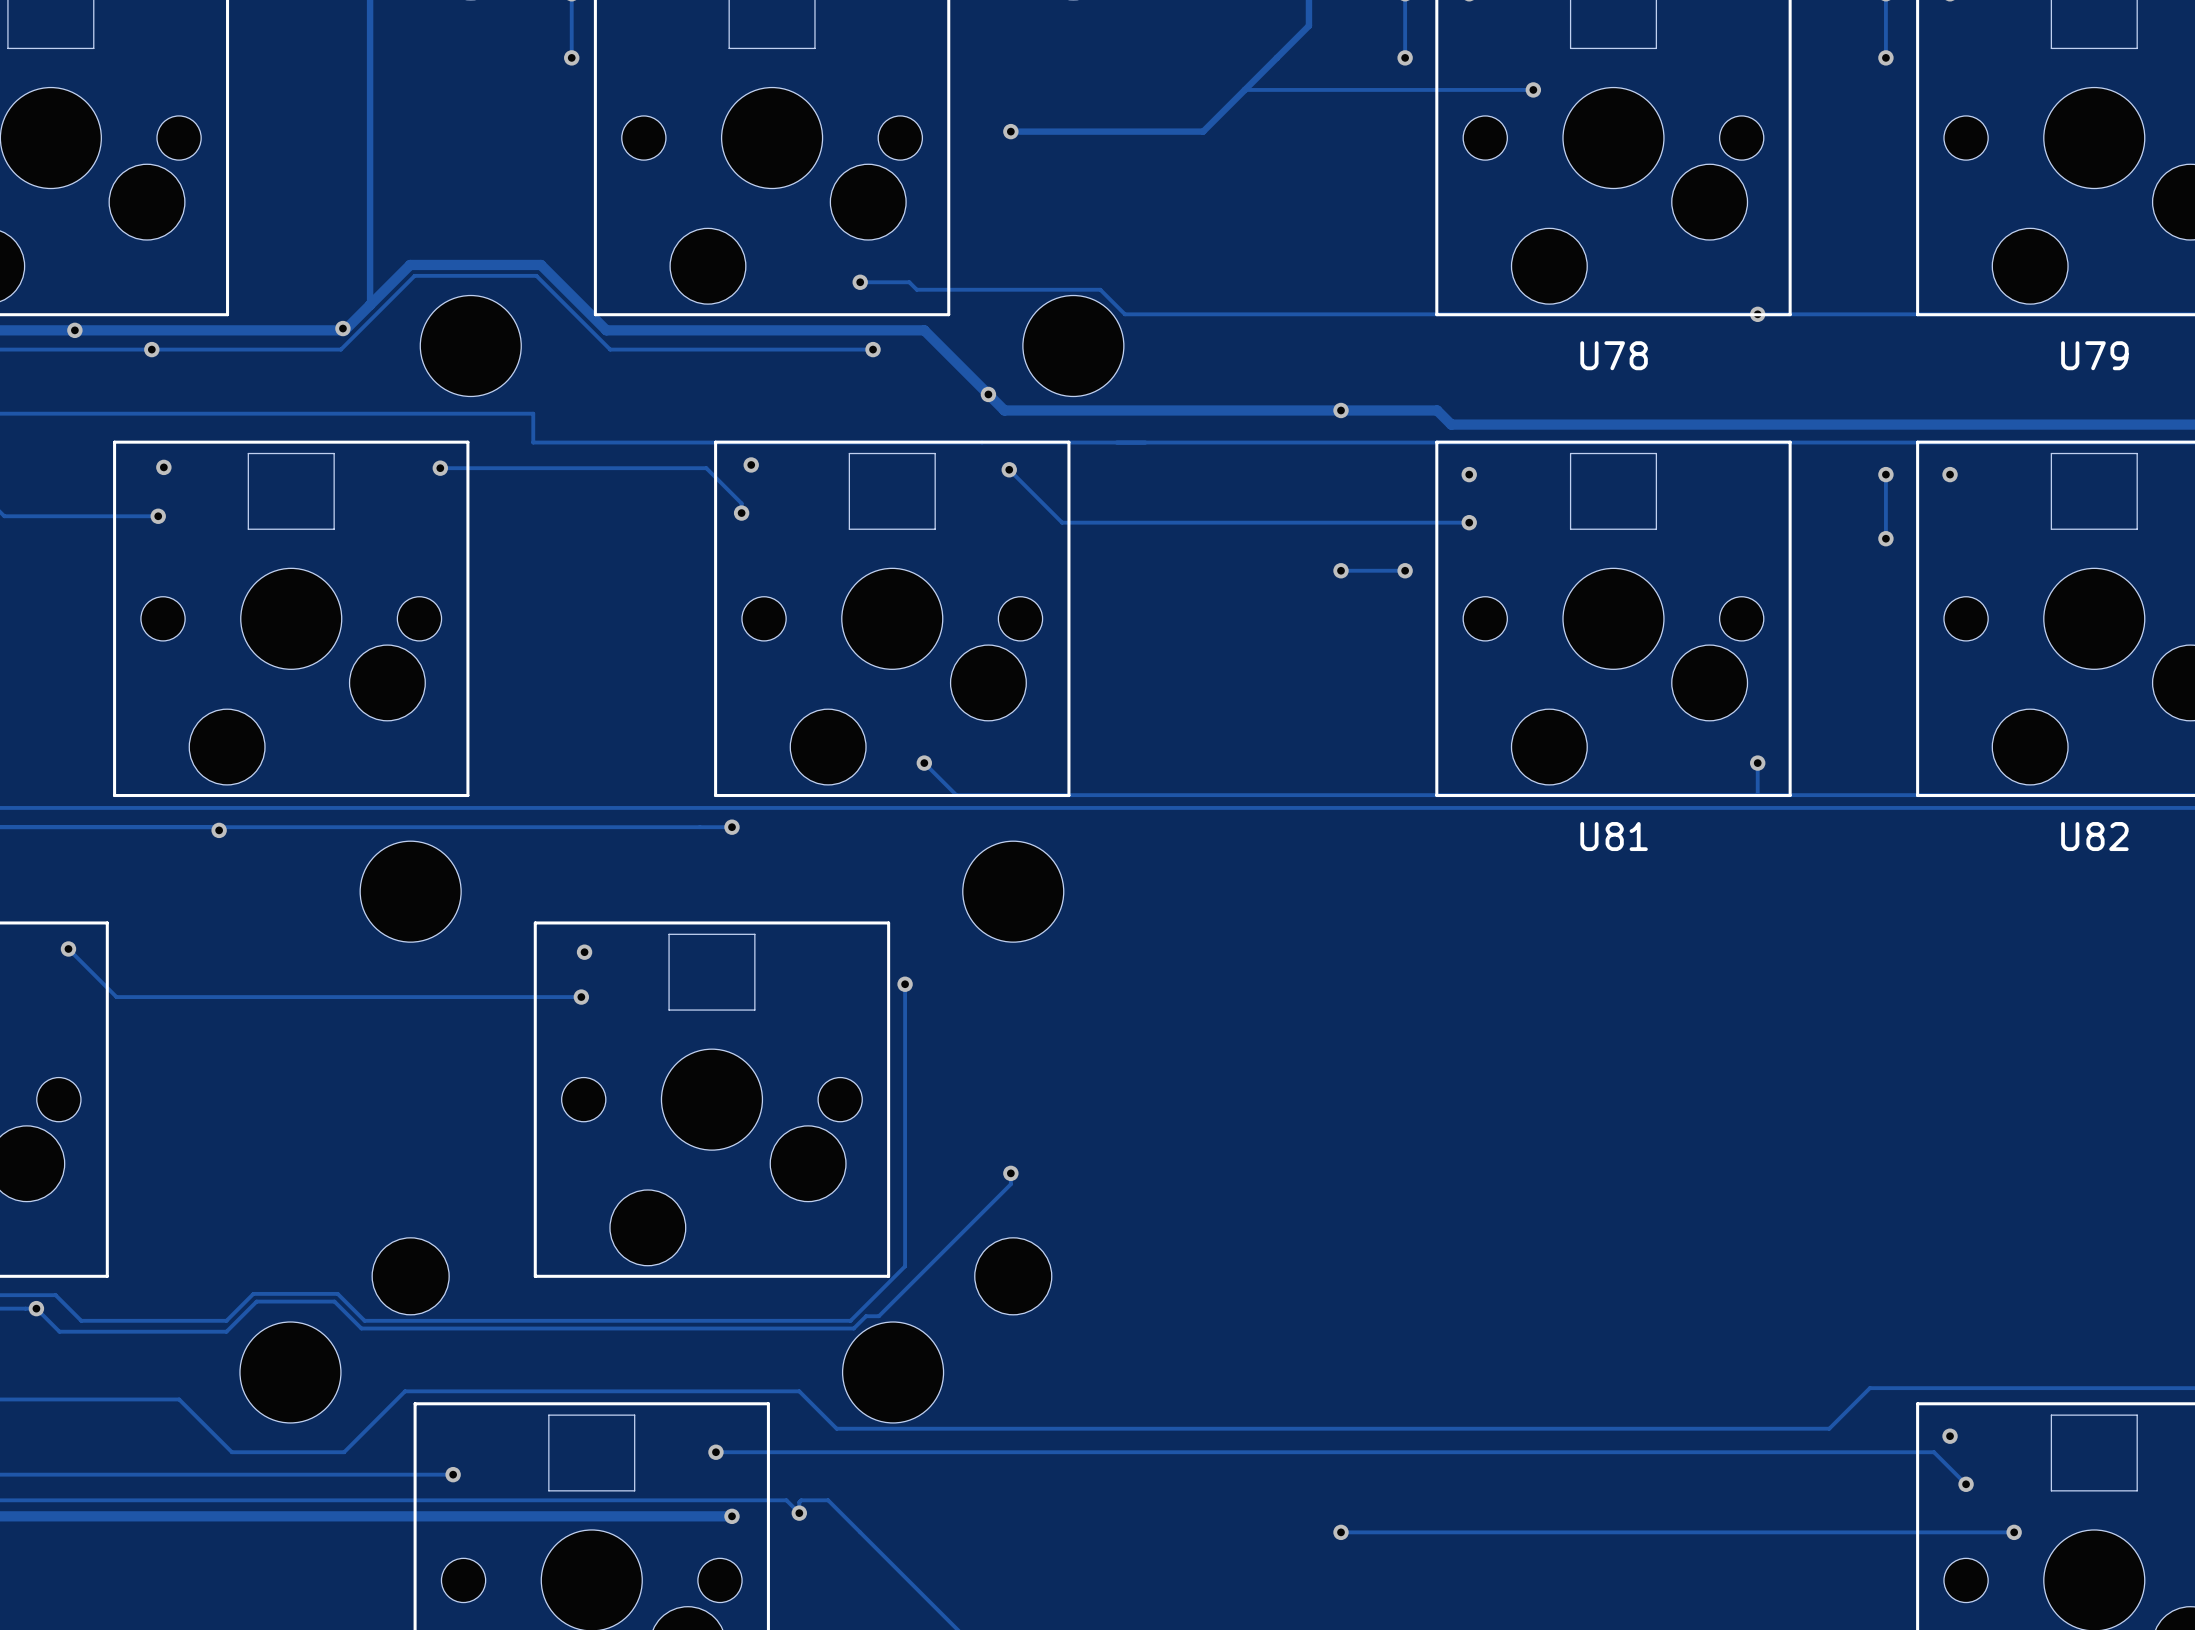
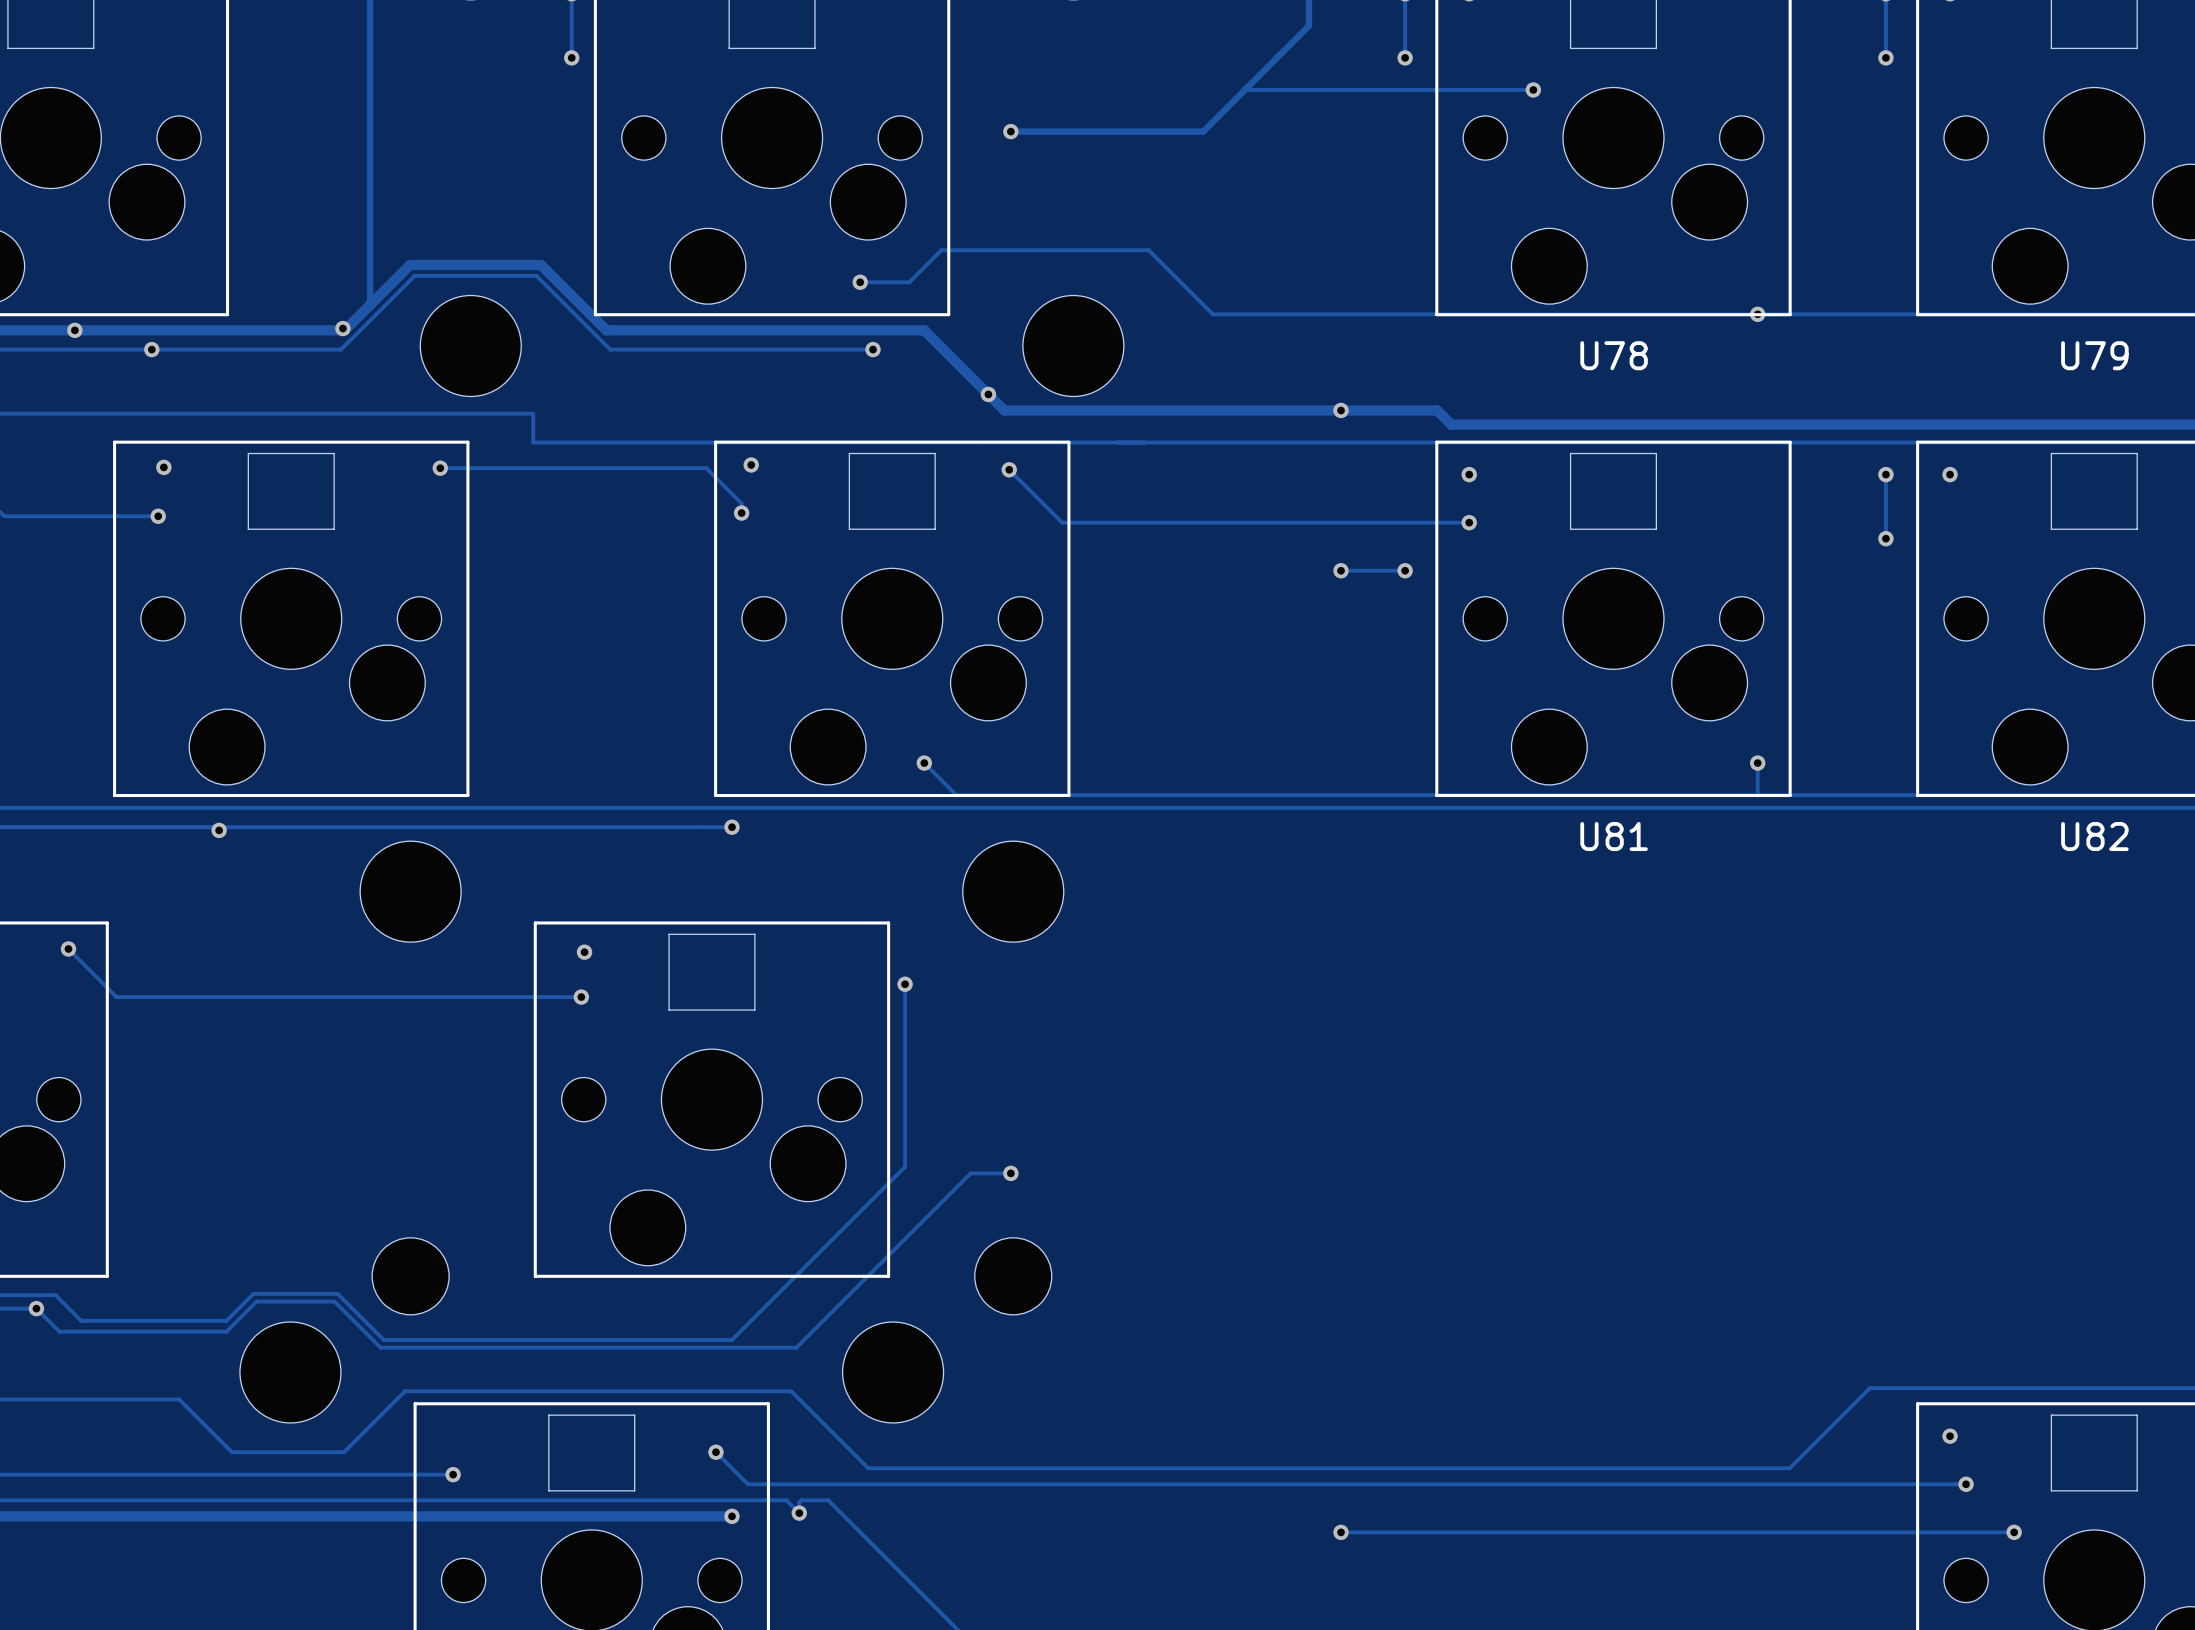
track: (909, 282) (916, 289) (1100, 289) (1124, 314) (1212, 314) -> (909, 282) (941, 250) (1148, 250) (1212, 314)
track: (905, 1166) (905, 1266) (850, 1320) (364, 1320) -> (905, 1166) (731, 1340) (383, 1340) (364, 1320)
track: (1010, 1173) (1010, 1184) (878, 1316) (866, 1316) (853, 1328) (361, 1328) -> (1010, 1173) (970, 1173) (796, 1347) (380, 1347) (361, 1328)
track: (791, 1391) (799, 1391) (836, 1428) (1829, 1428) -> (791, 1391) (868, 1468) (1789, 1468) (1829, 1428)
track: (715, 1452) (1934, 1452) (1966, 1484) -> (715, 1452) (748, 1484) (1966, 1484)

